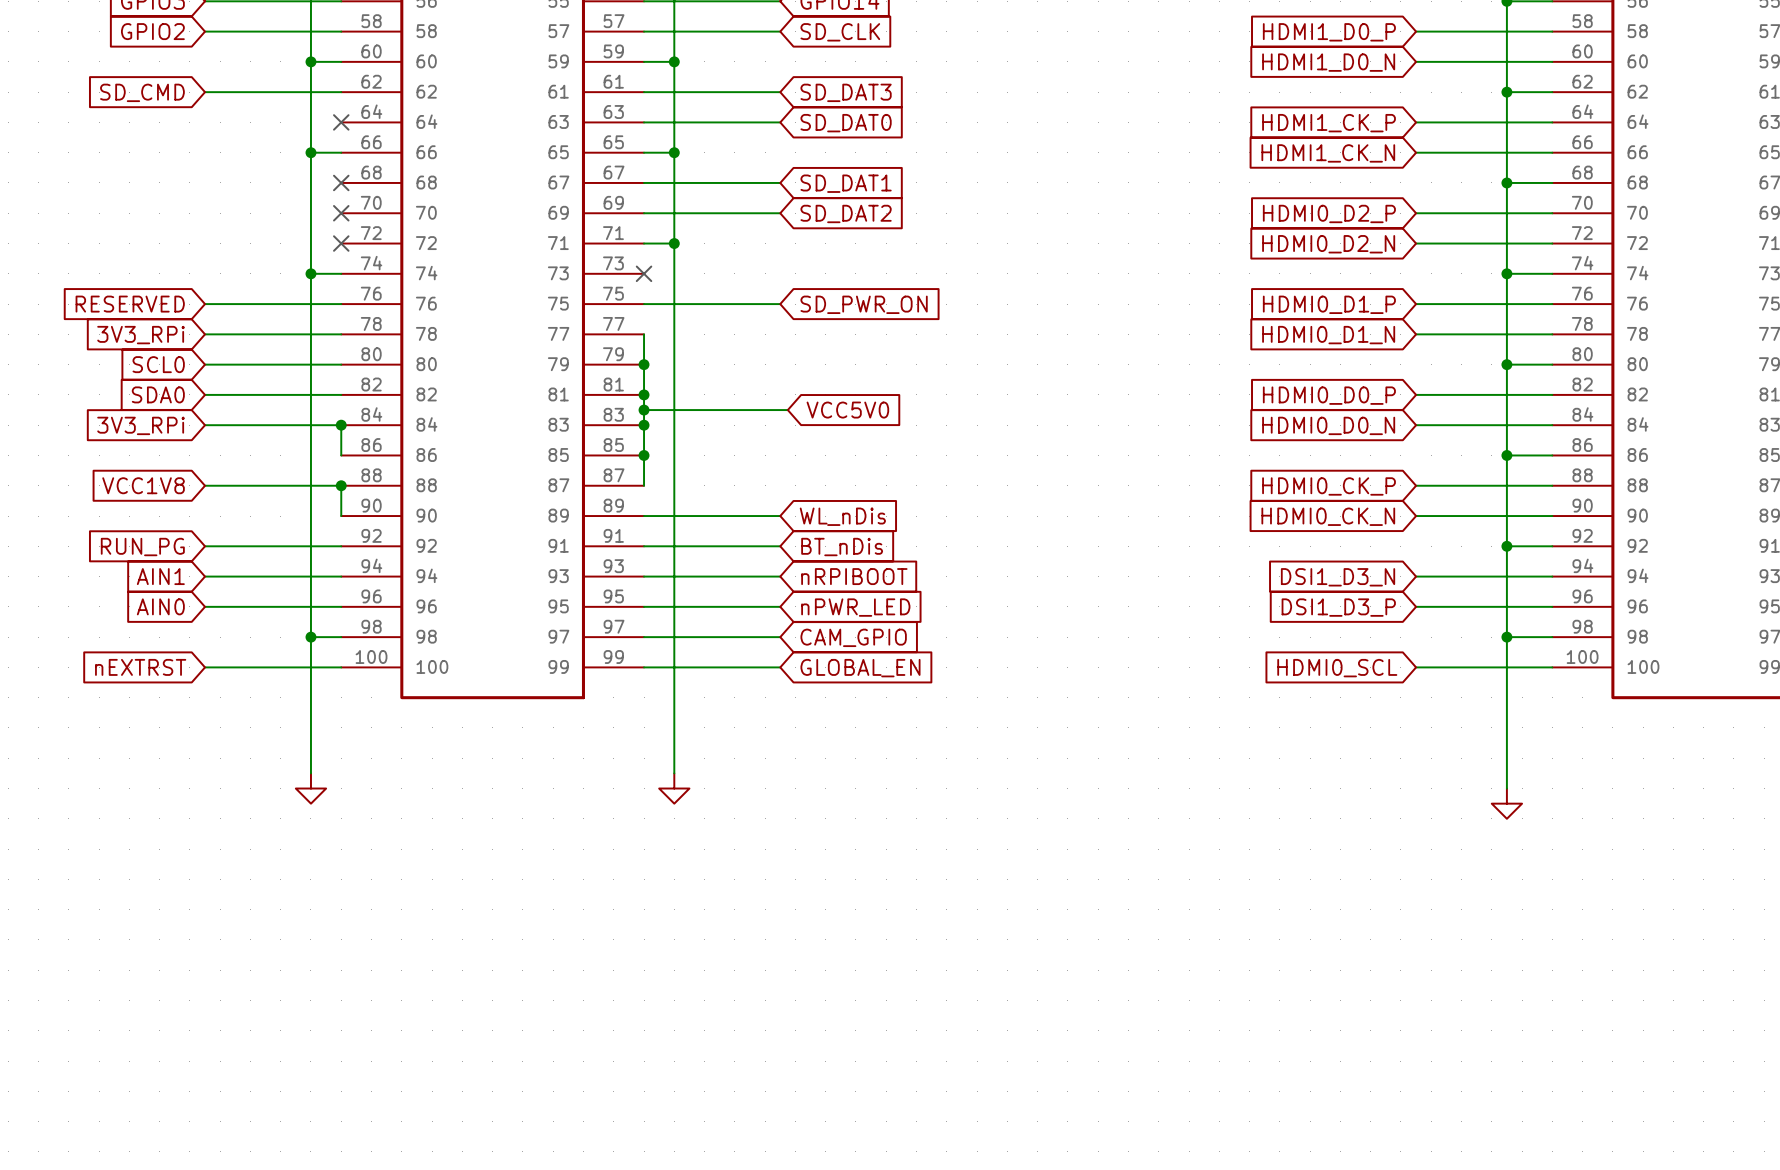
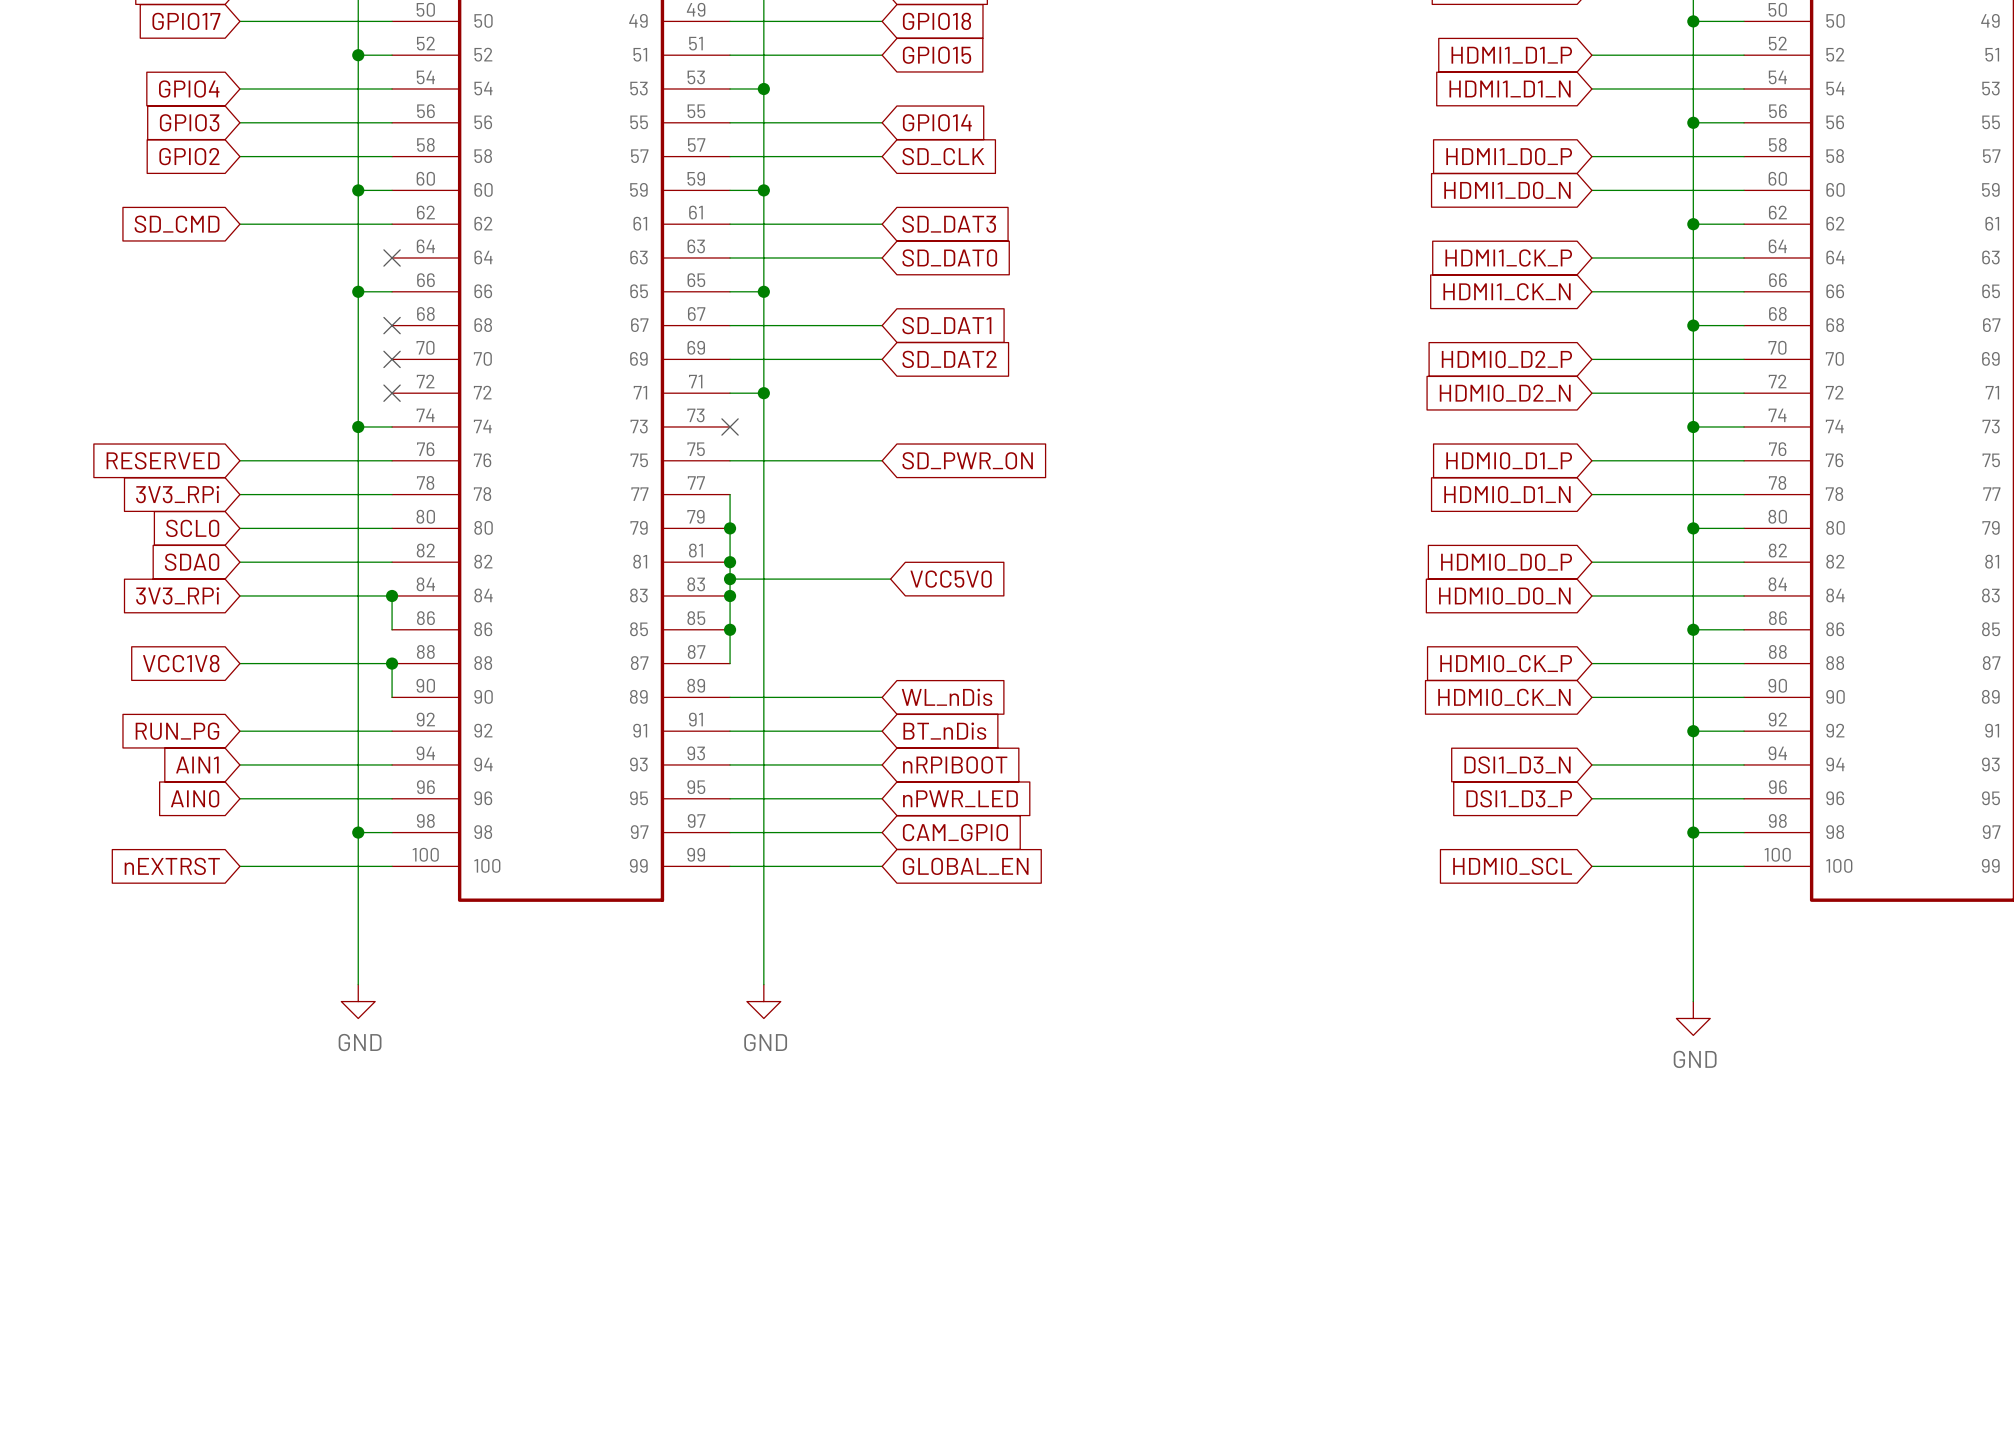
power symbol text: none -> GND (360, 1042)
power symbol text: none -> GND (765, 1042)
power symbol text: none -> GND (1695, 1059)

